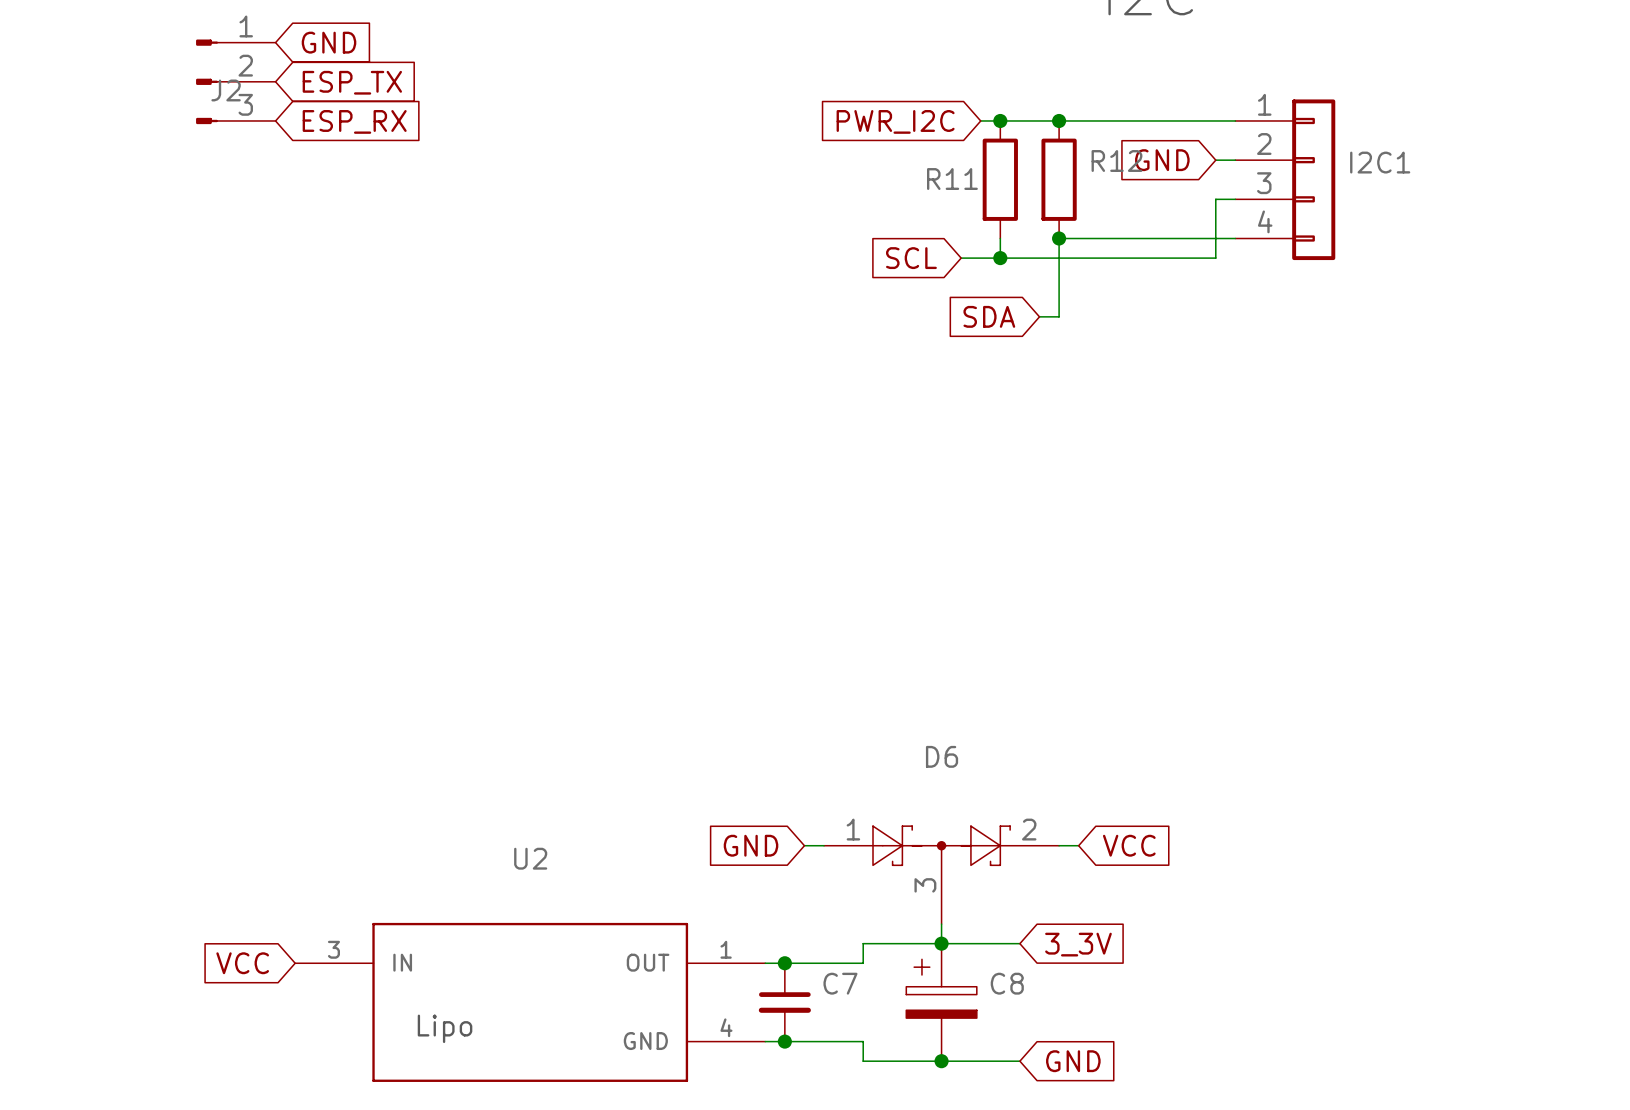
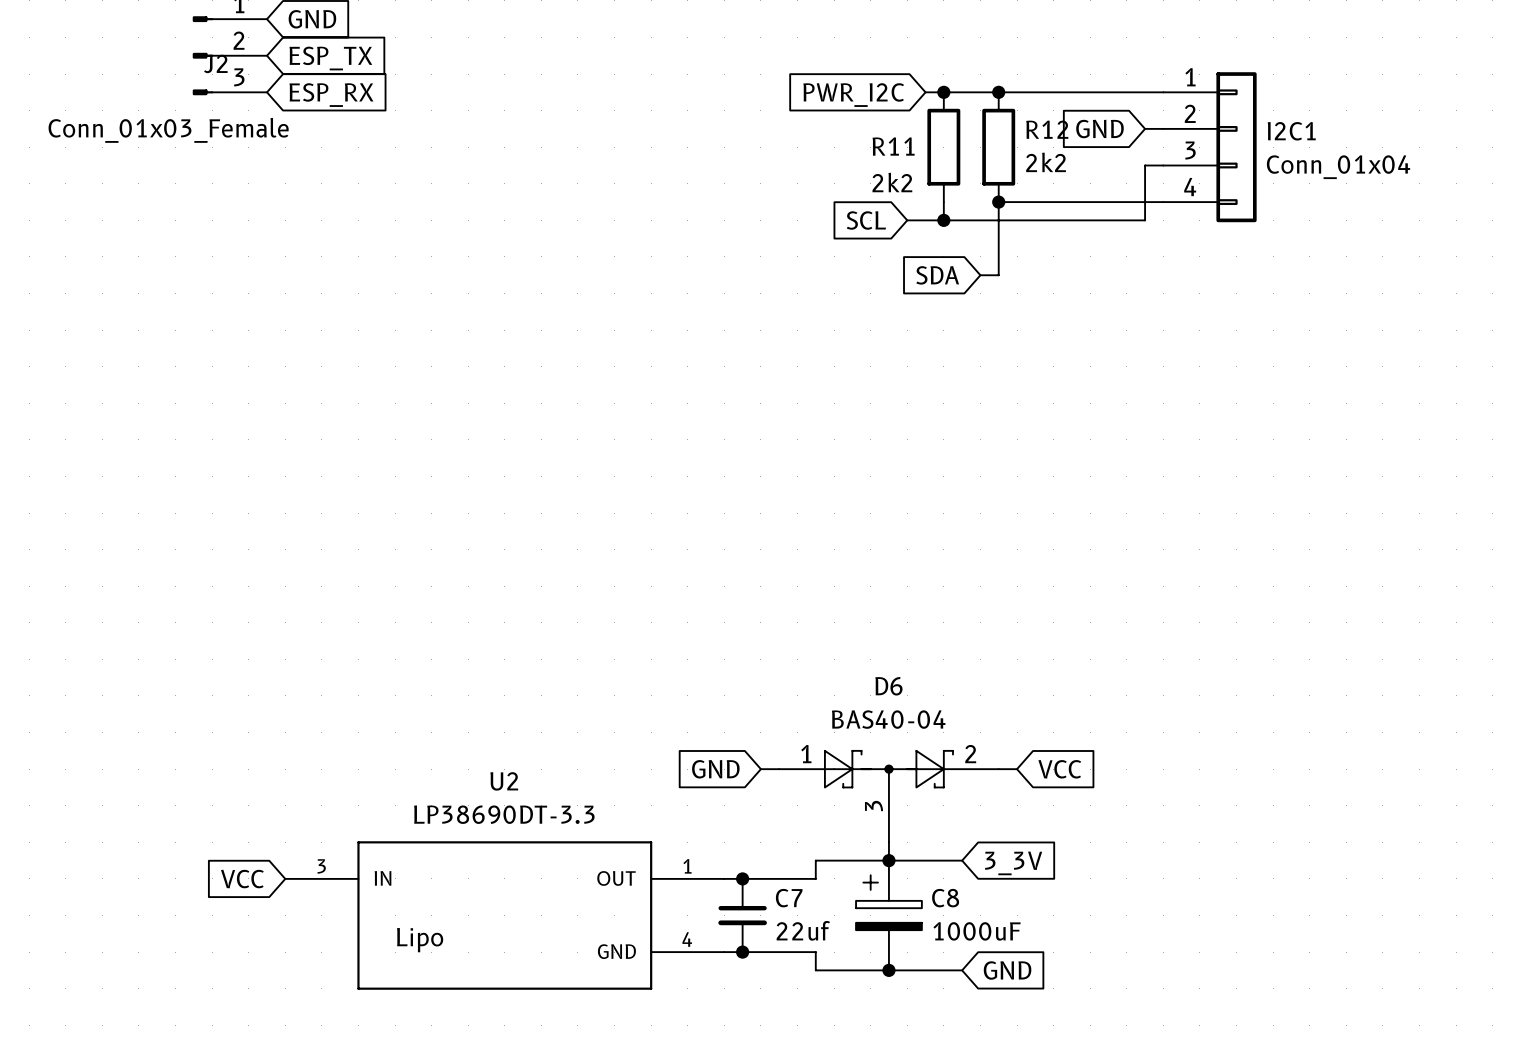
J2 value: none -> Conn_01x03_Female (168, 130)
R12 value: none -> 2k2 (1046, 162)
I2C1 value: none -> Conn_01x04 (1338, 167)
R11 value: none -> 2k2 (892, 182)
D6 value: none -> BAS40-04 (888, 719)
U2 value: none -> LP38690DT-3.3 (504, 814)
C7 value: none -> 22uf (803, 930)
C8 value: none -> 1000uF (977, 931)

